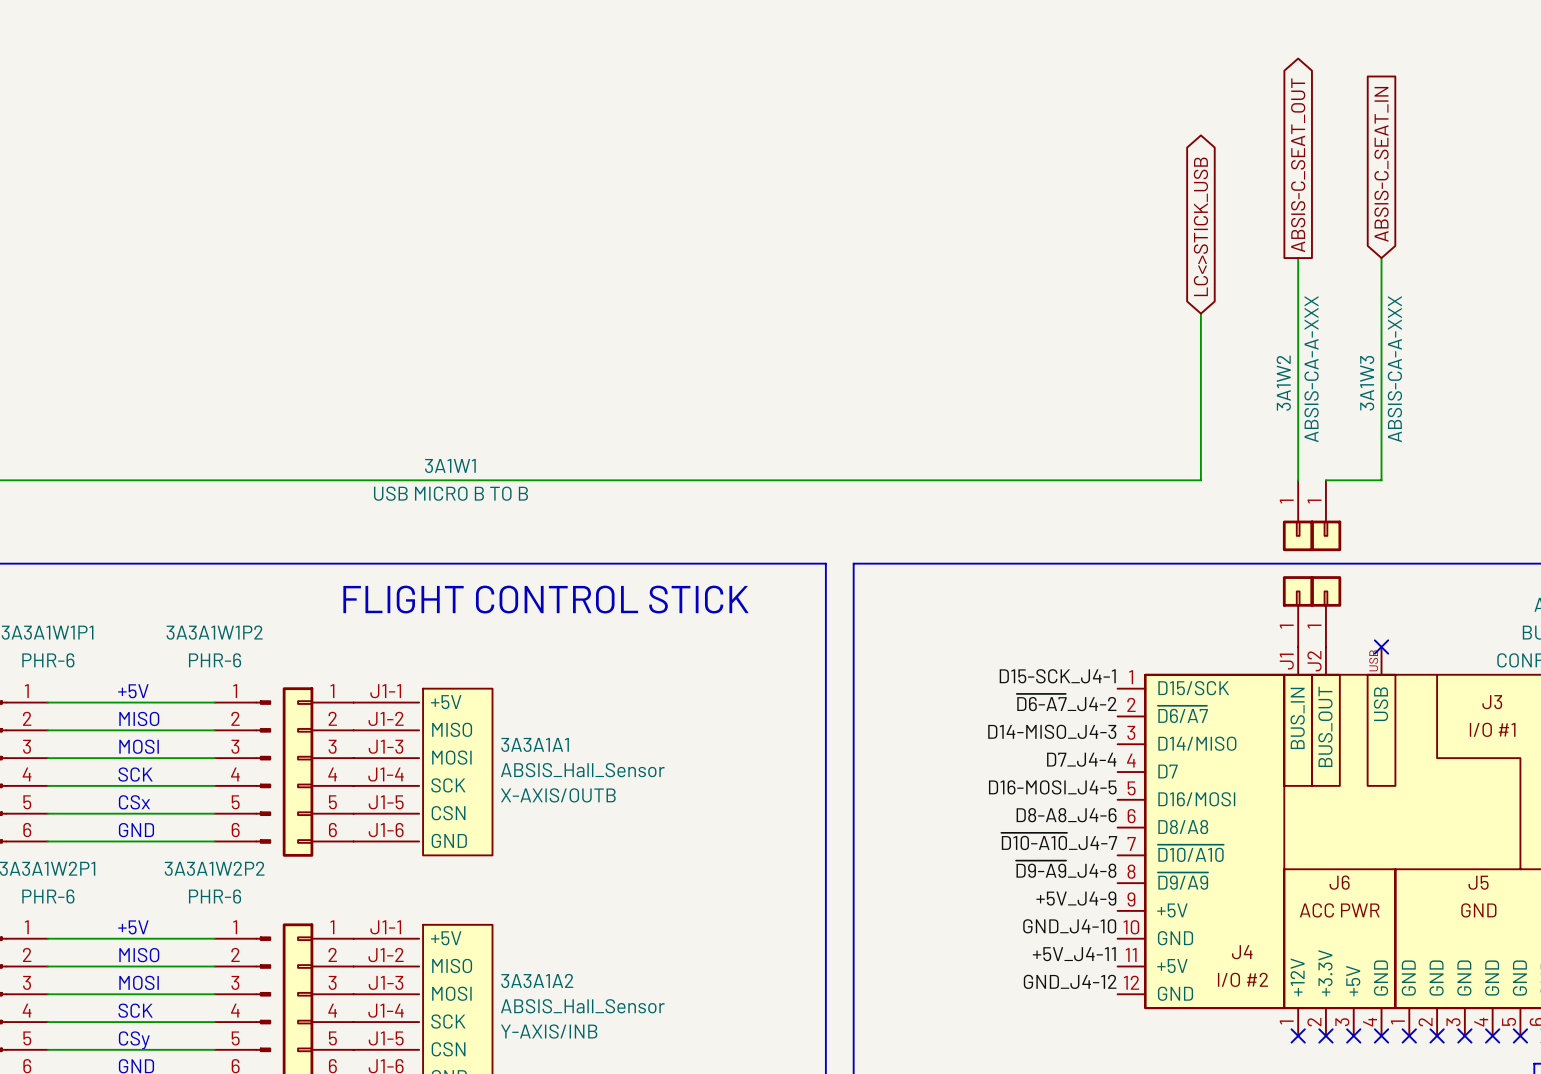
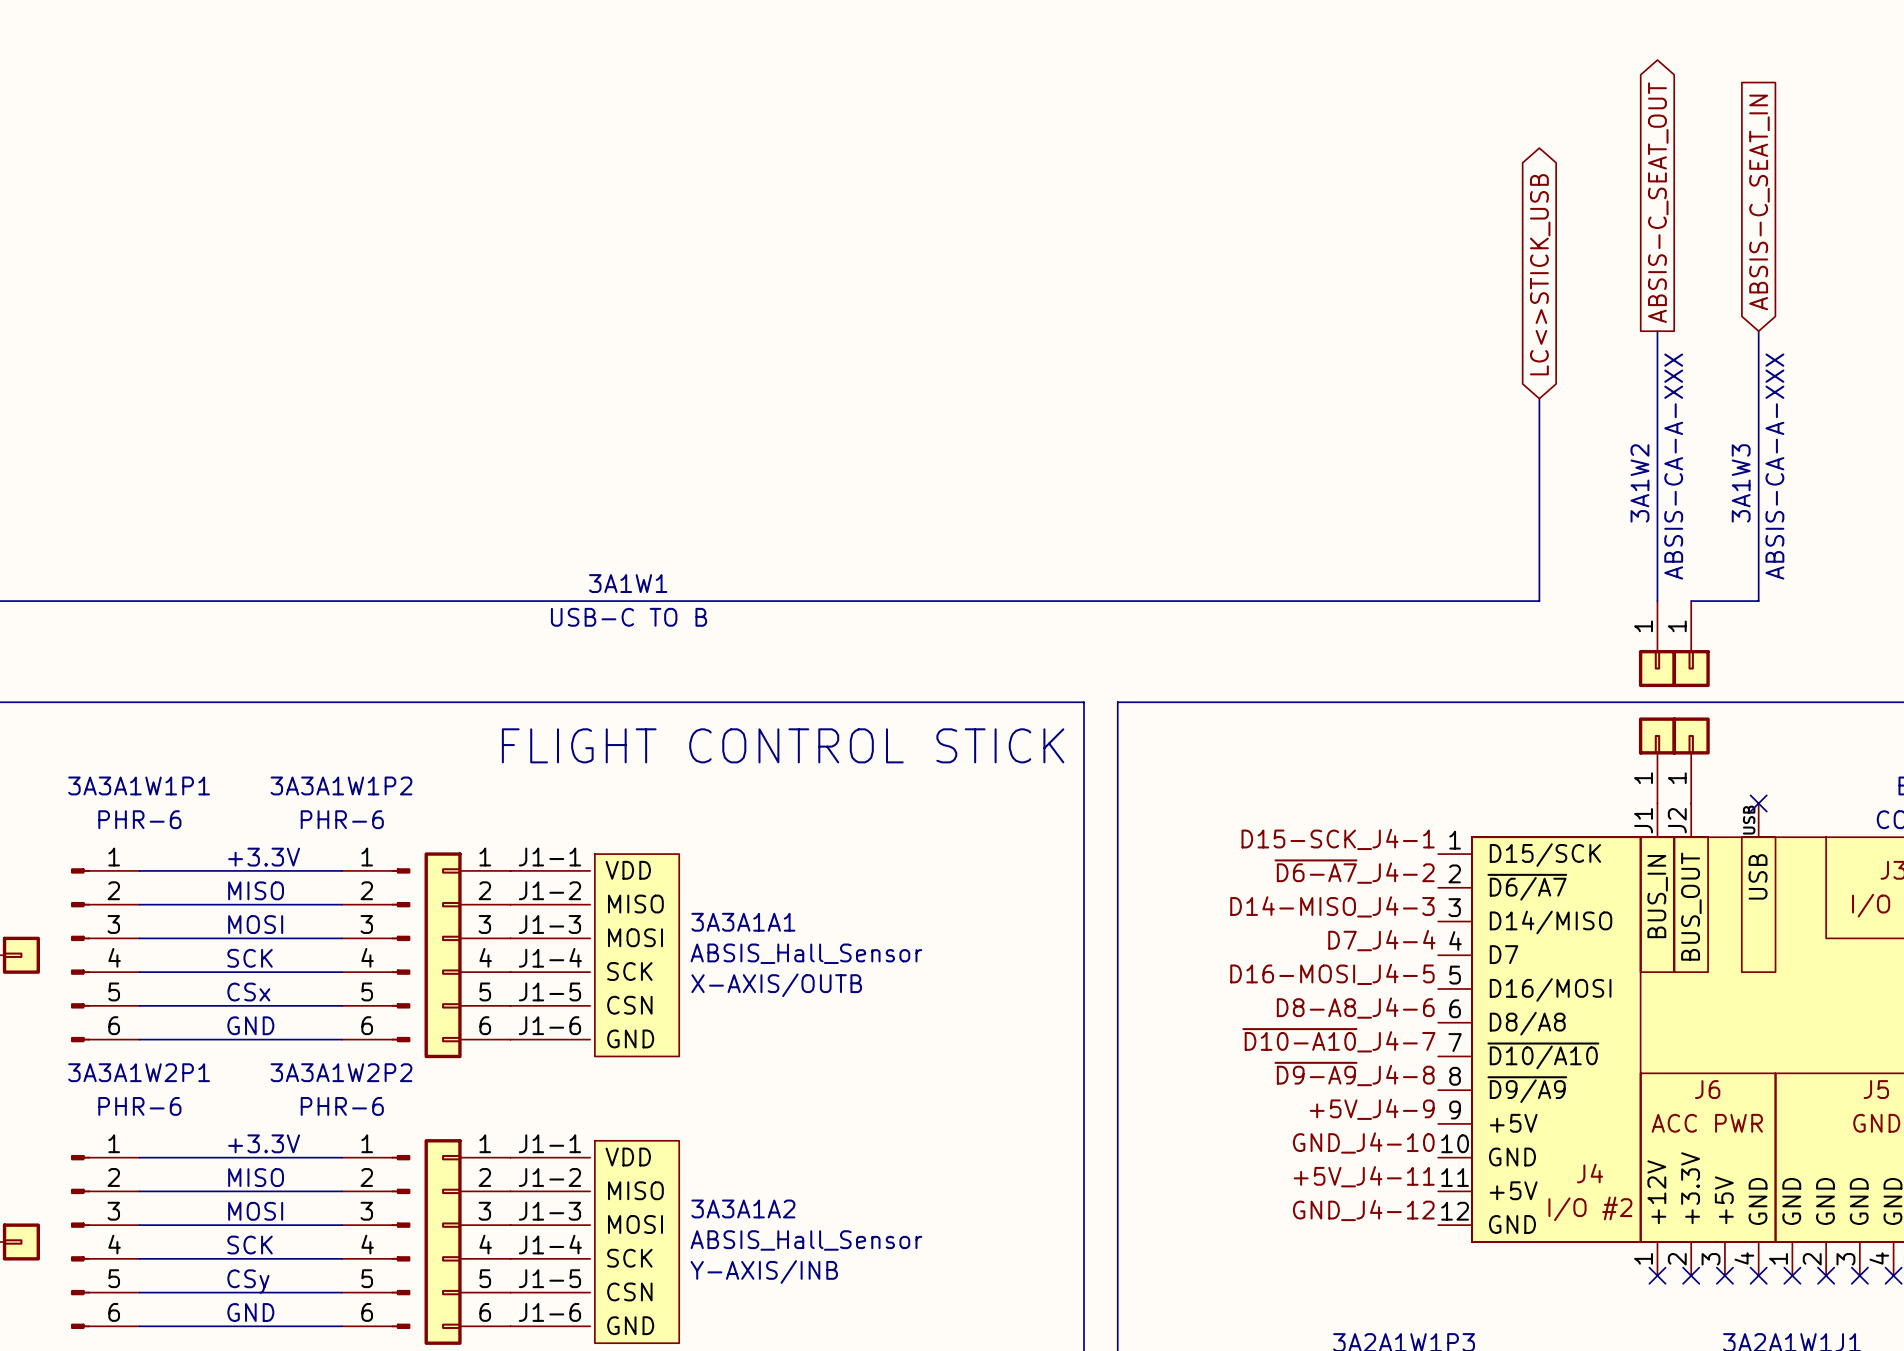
3A1W1 value: USB MICRO B TO B (450, 493) -> USB-C TO B (629, 617)
text: +5V (133, 691) -> +3.3V (264, 857)
3A3A1A1 pin name: +5V (446, 702) -> VDD (628, 870)
text: +5V (133, 927) -> +3.3V (264, 1143)
3A3A1A2 pin name: +5V (446, 938) -> VDD (628, 1157)

